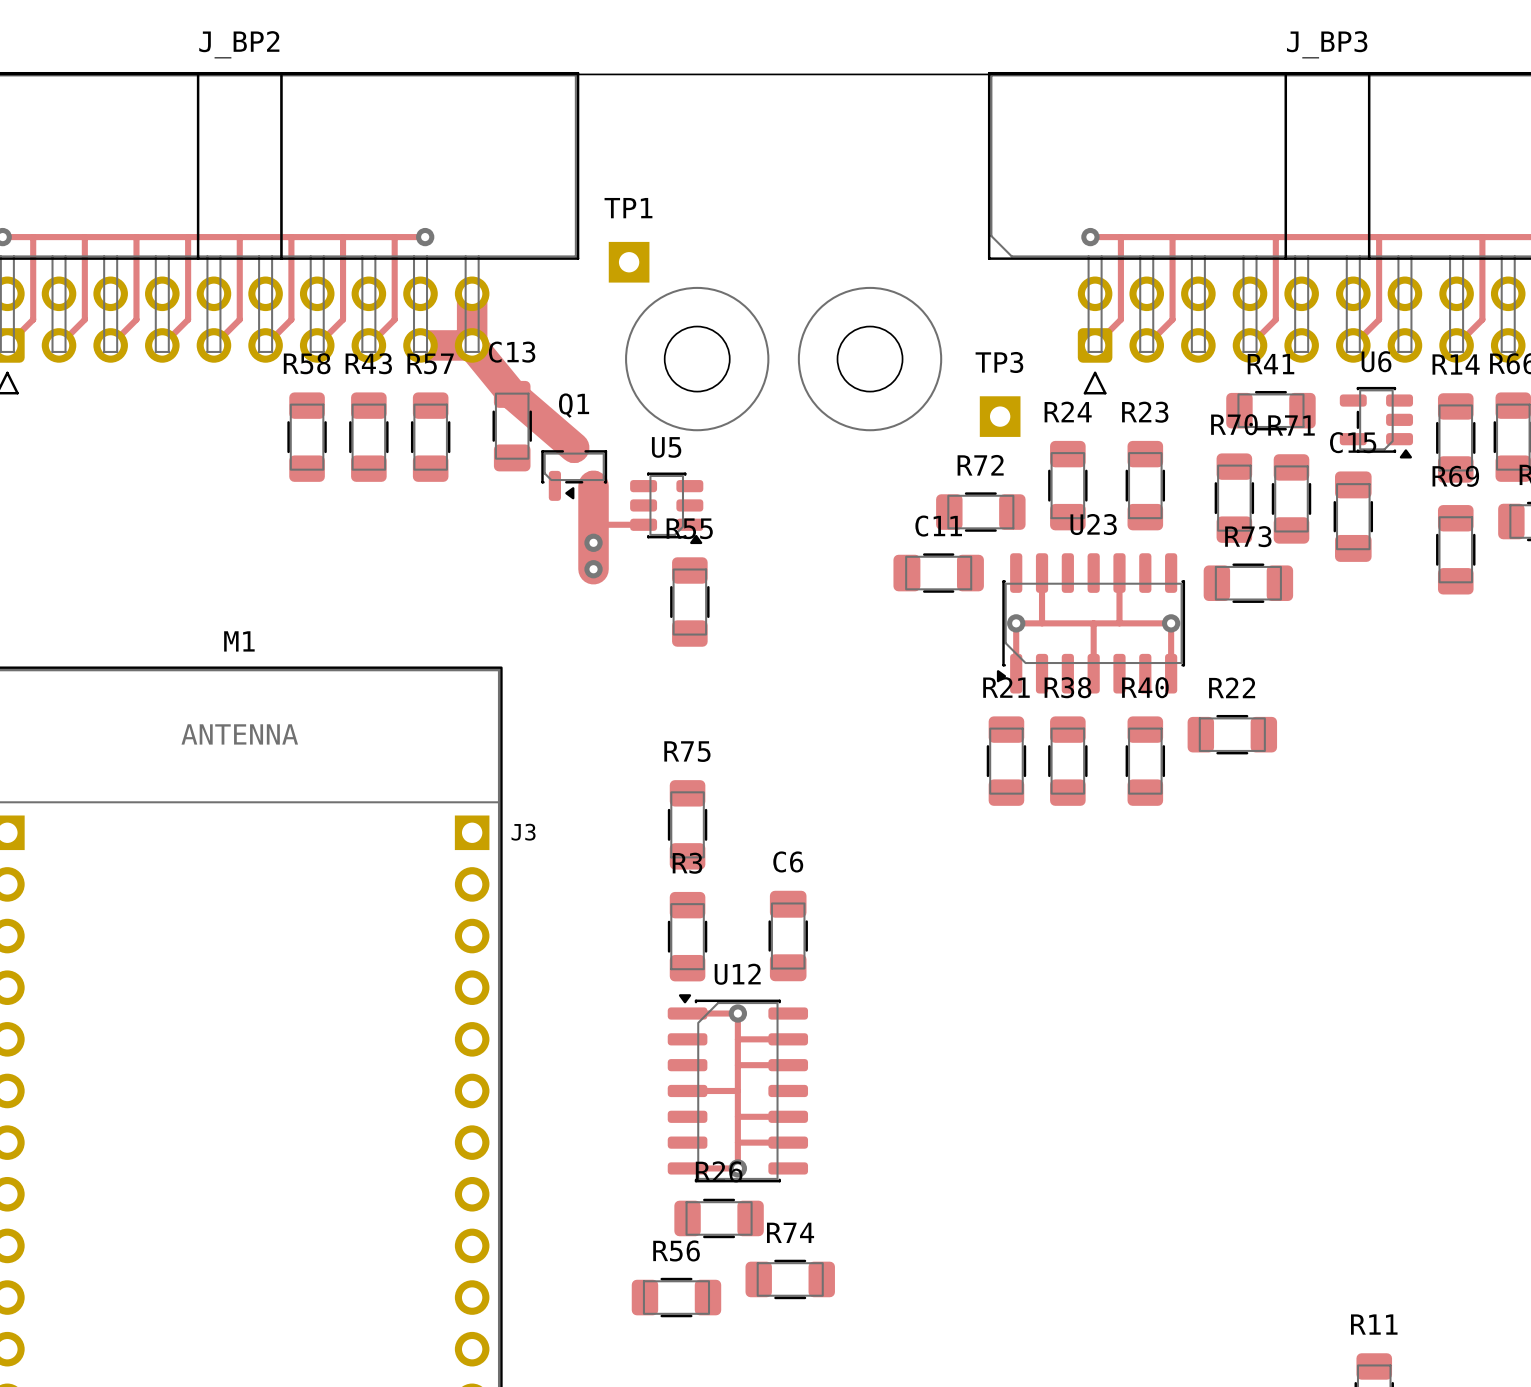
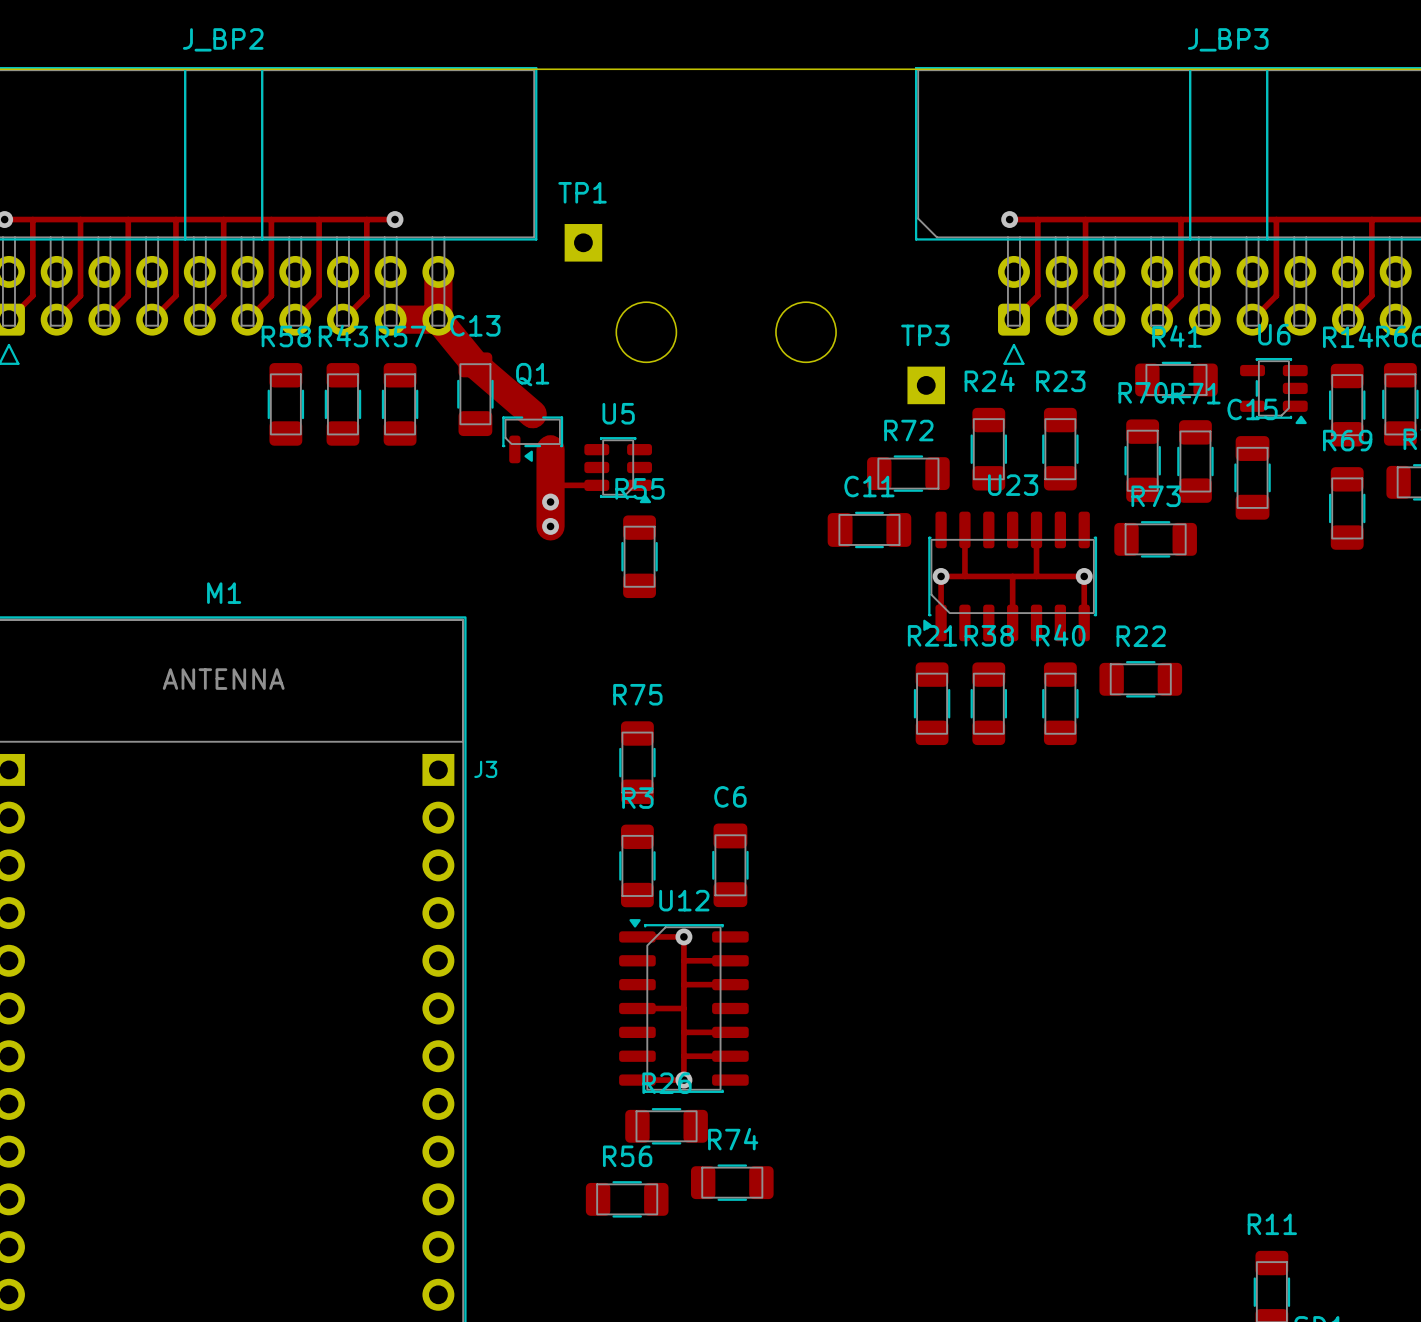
drawing: [625, 286, 770, 432] -> none
drawing: [797, 286, 943, 432] -> none

